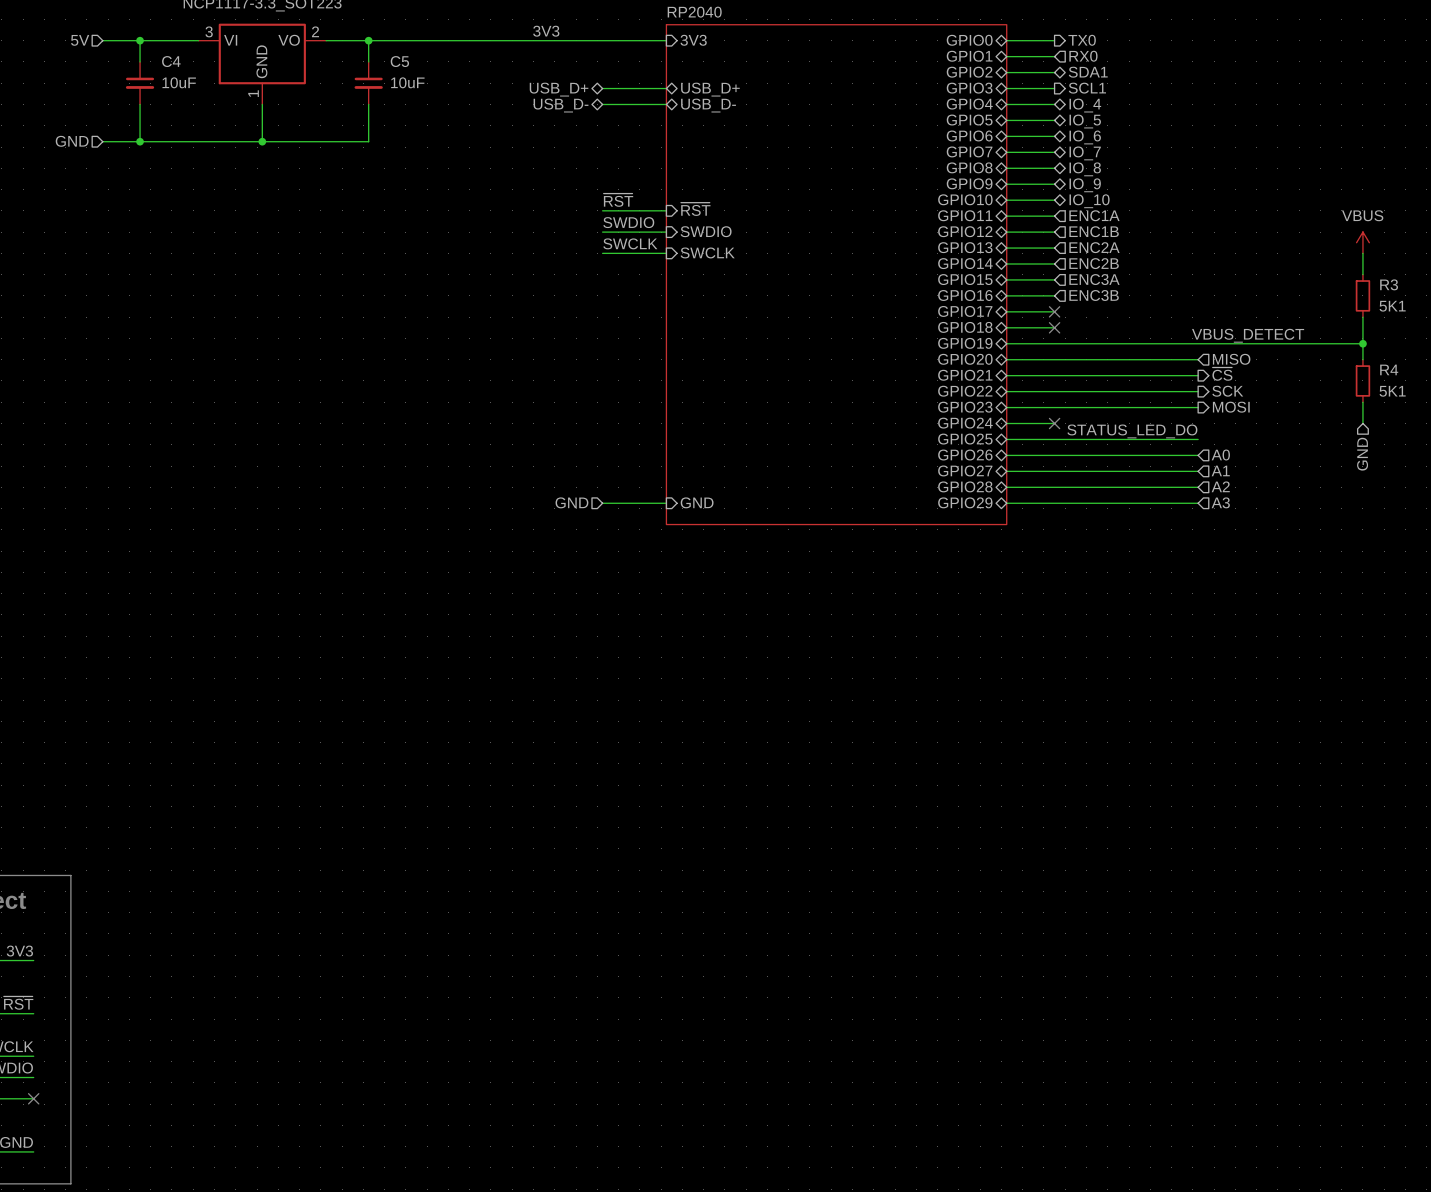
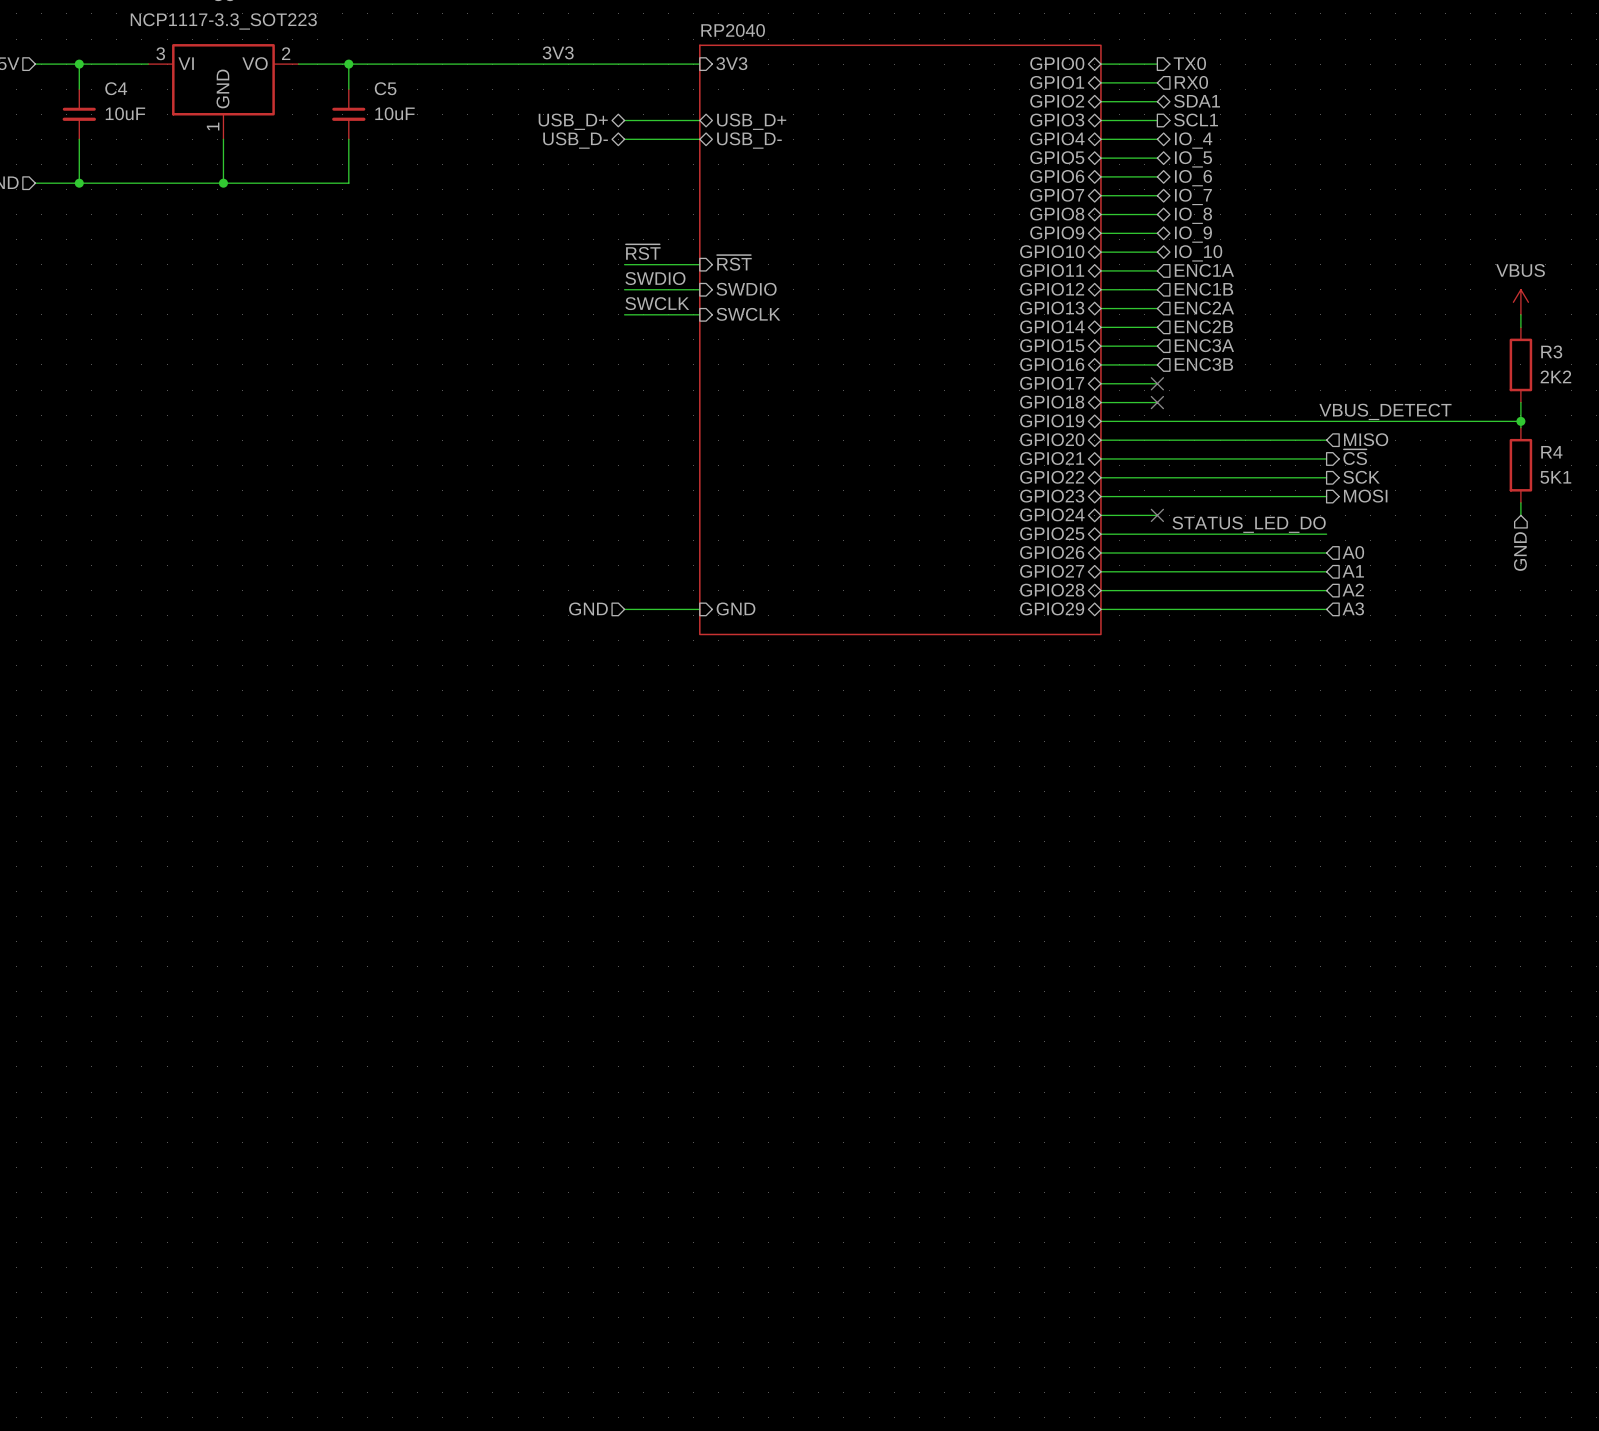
R3 symbol: [1355, 274, 1371, 318] -> [1509, 327, 1533, 403]
R3 value: 5K1 (1392, 306) -> 2K2 (1555, 376)
R4 symbol: [1355, 359, 1371, 403] -> [1509, 427, 1533, 503]

